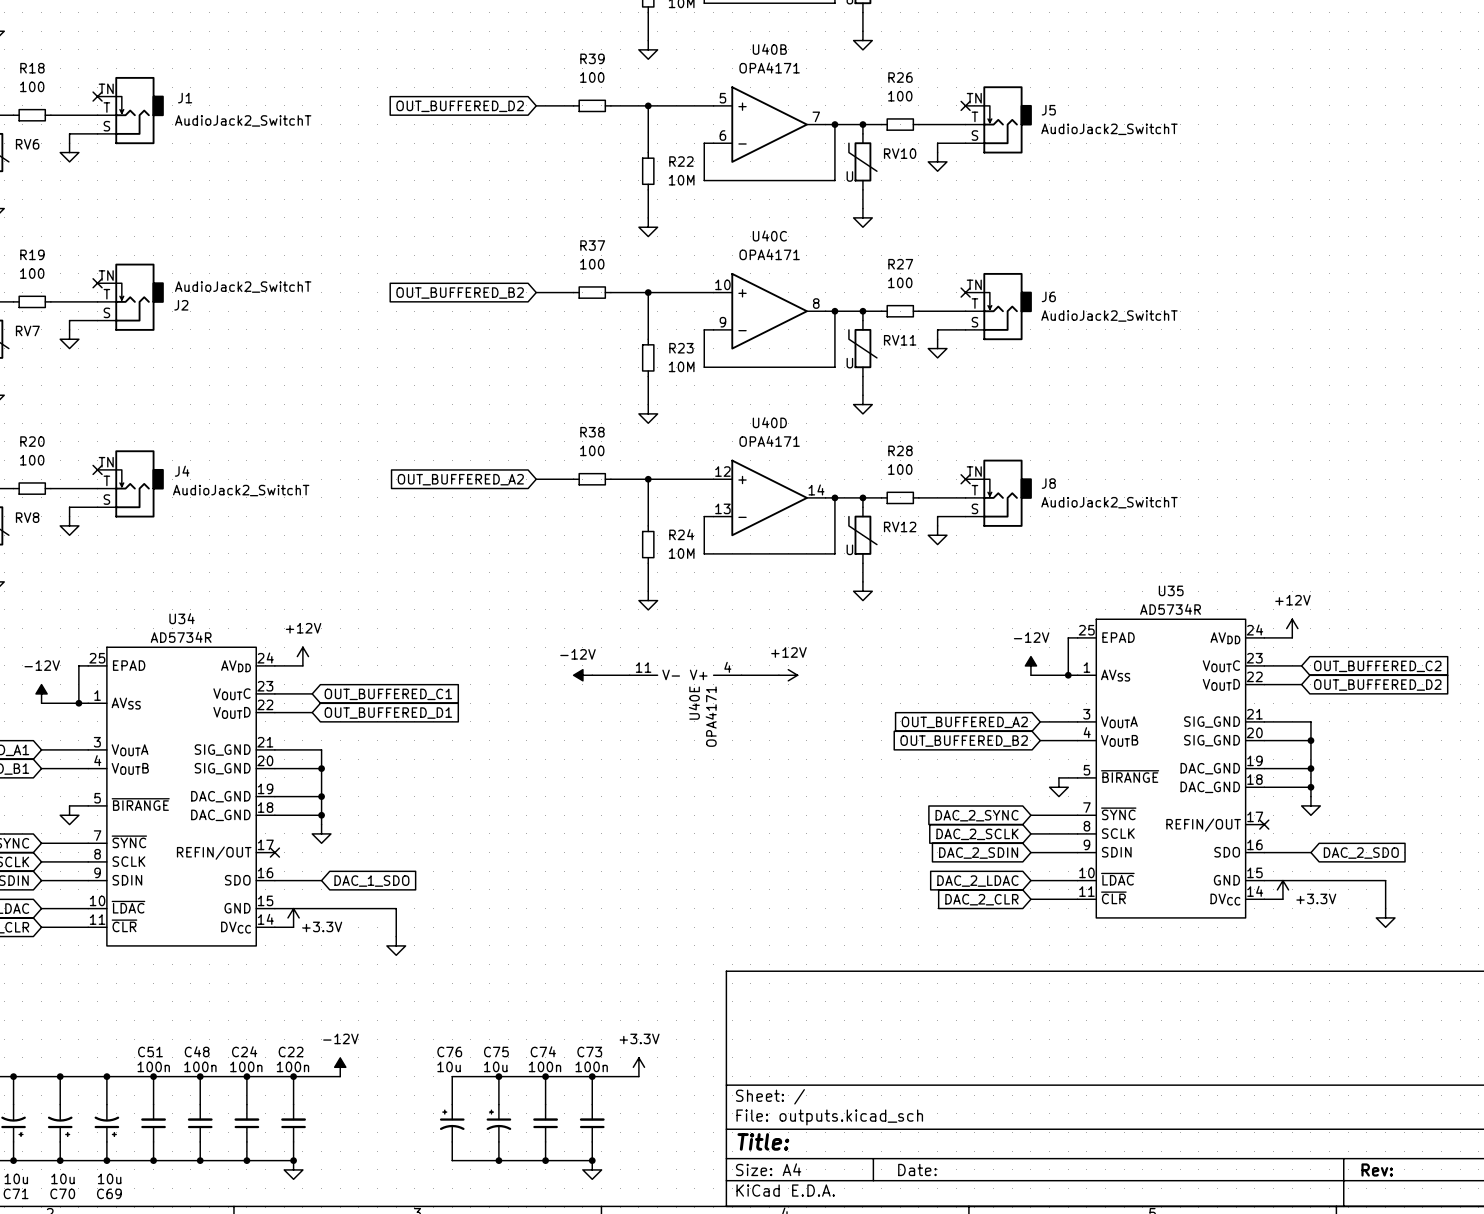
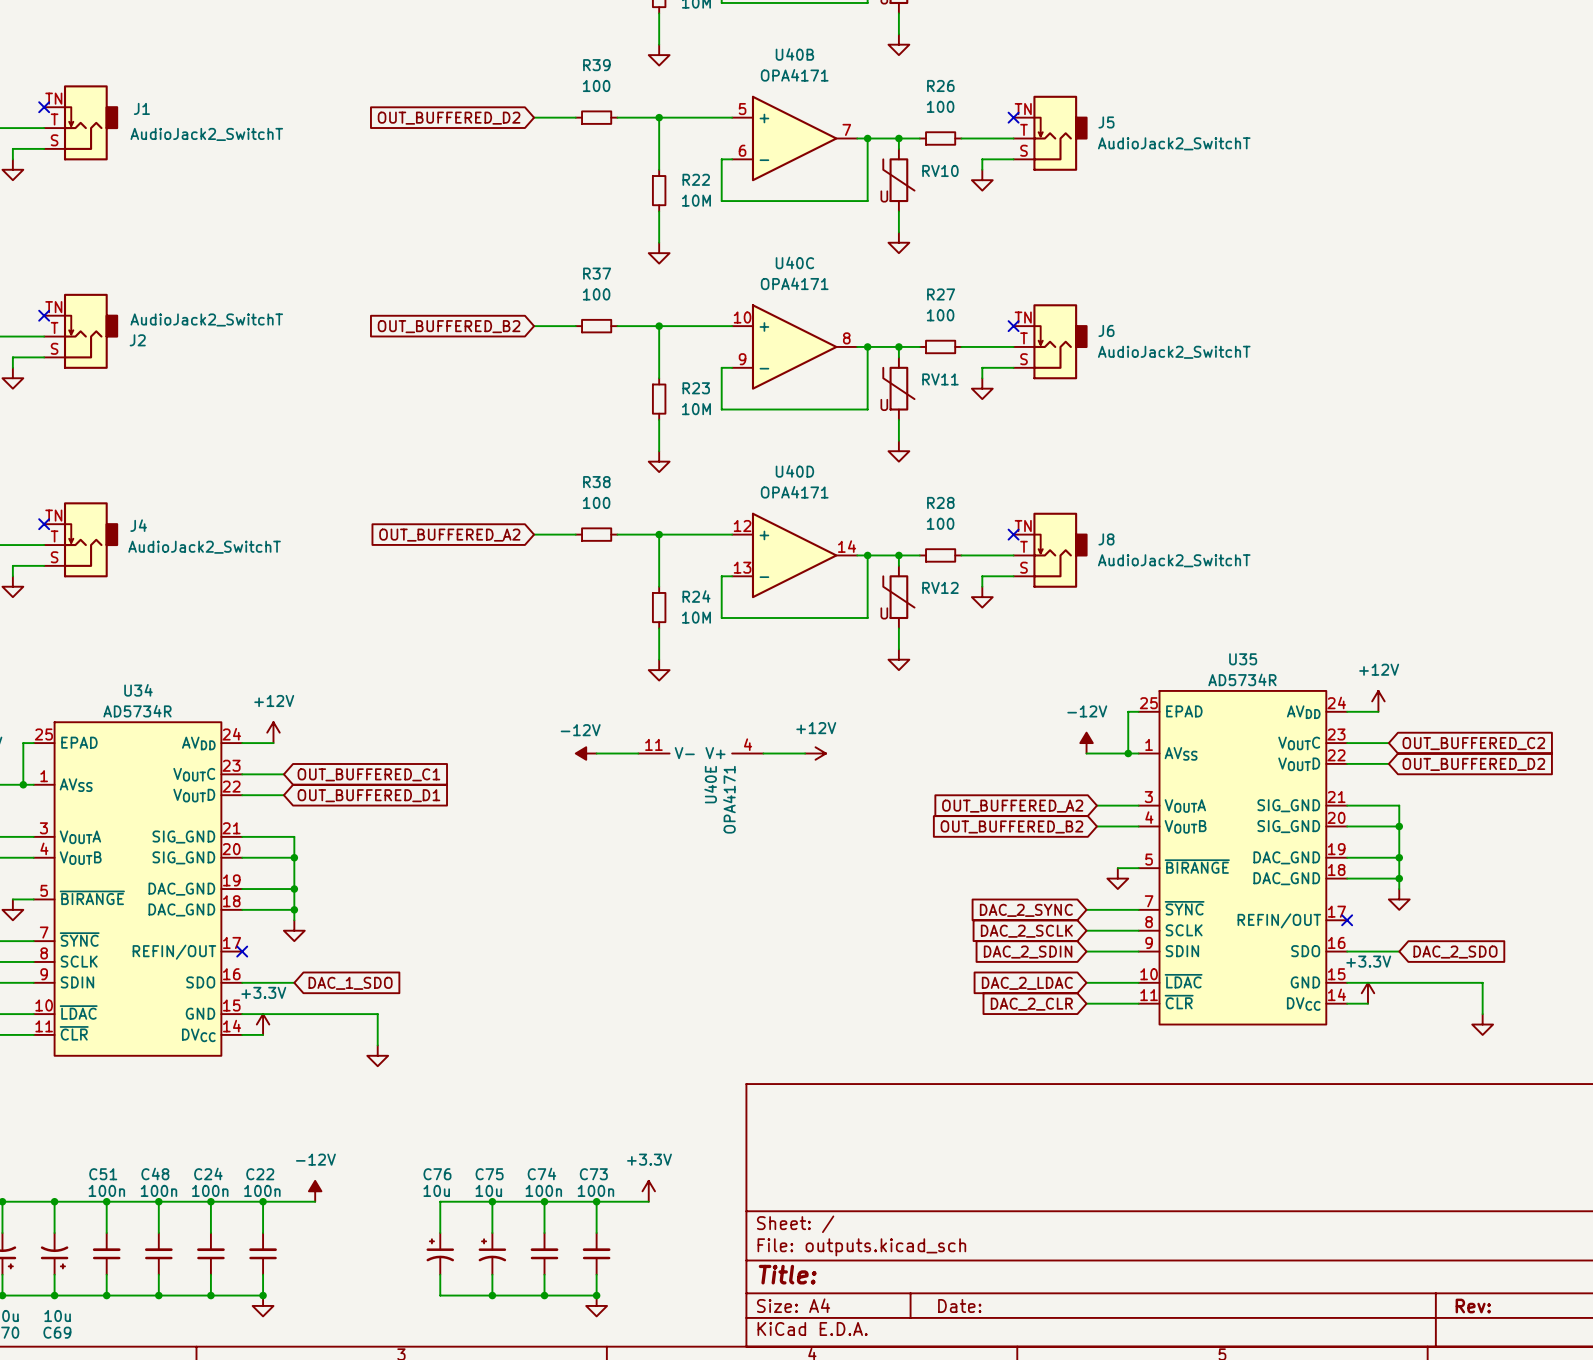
power symbol text position: +3.3V (1316, 898) -> +3.3V (1368, 961)
power symbol text position: +3.3V (322, 926) -> +3.3V (263, 992)

